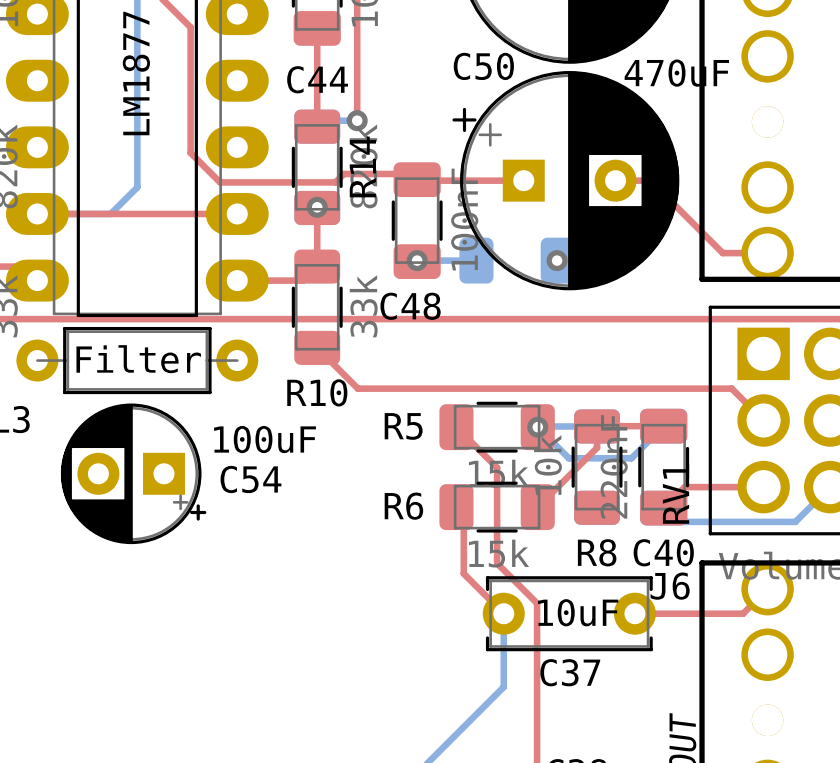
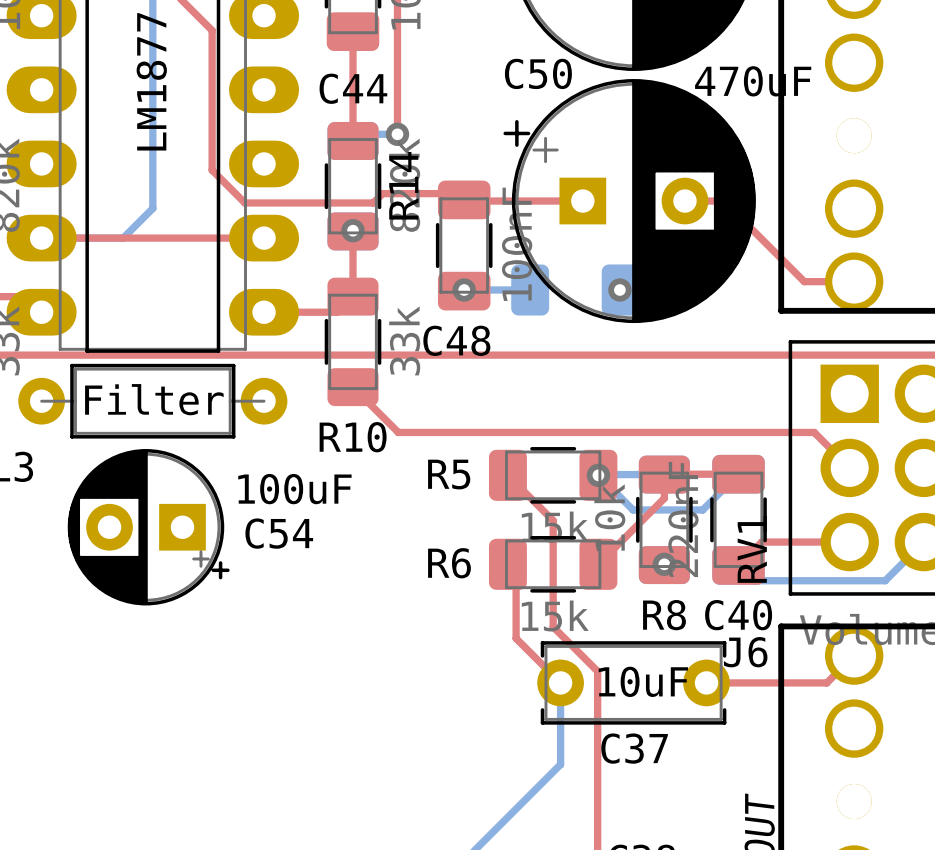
via: none -> (664, 564)

